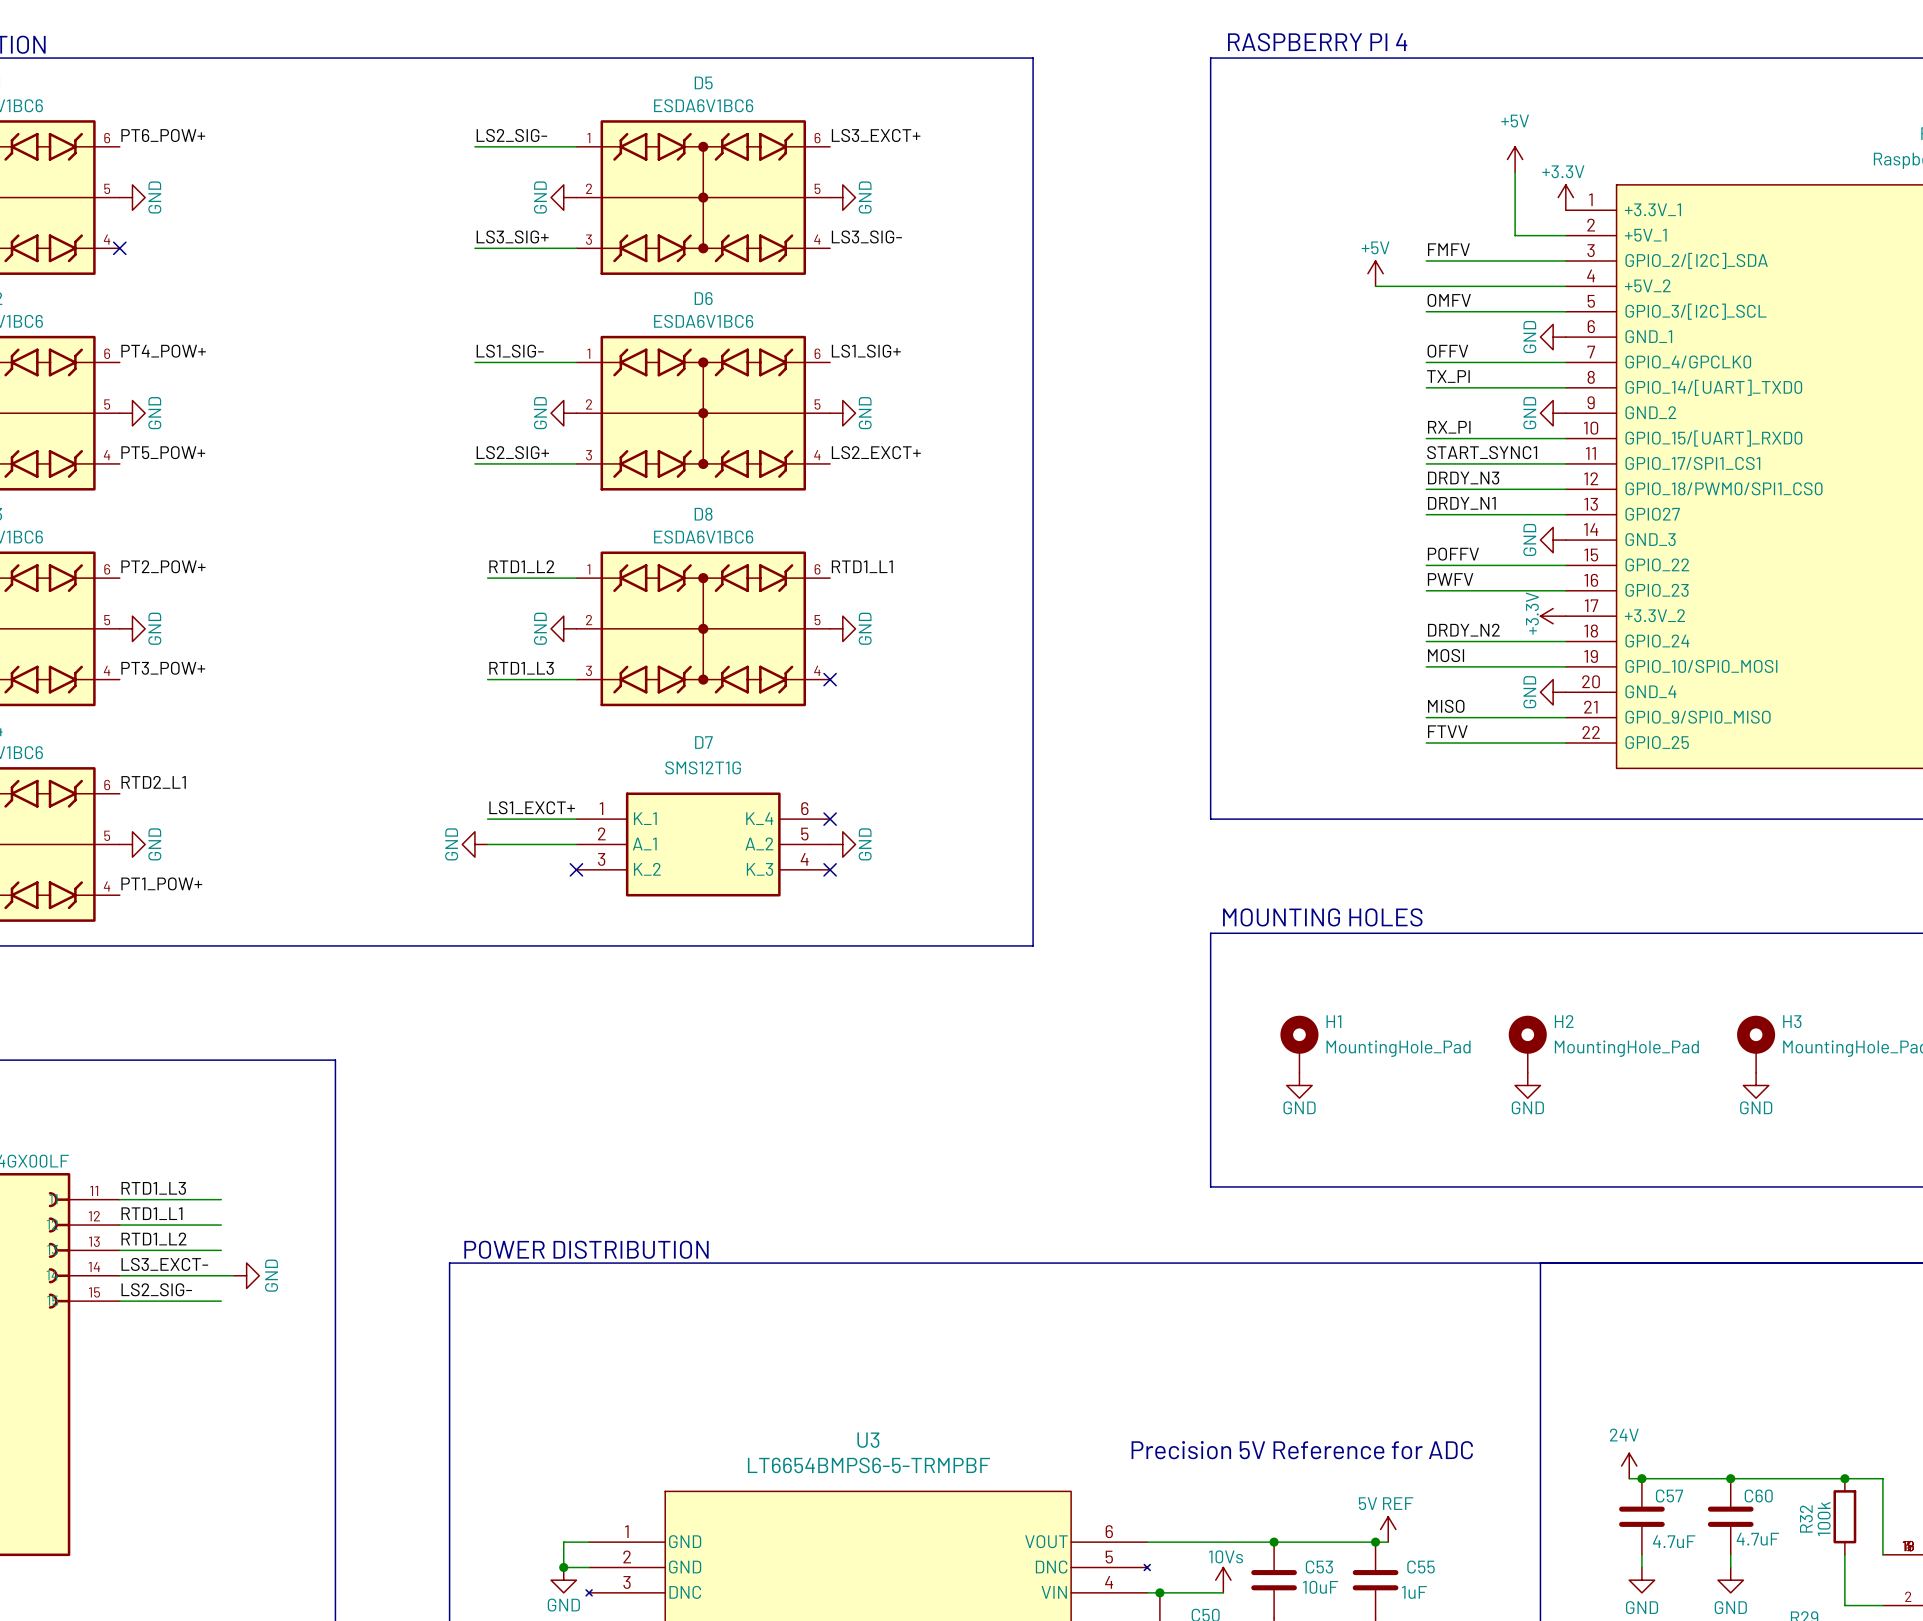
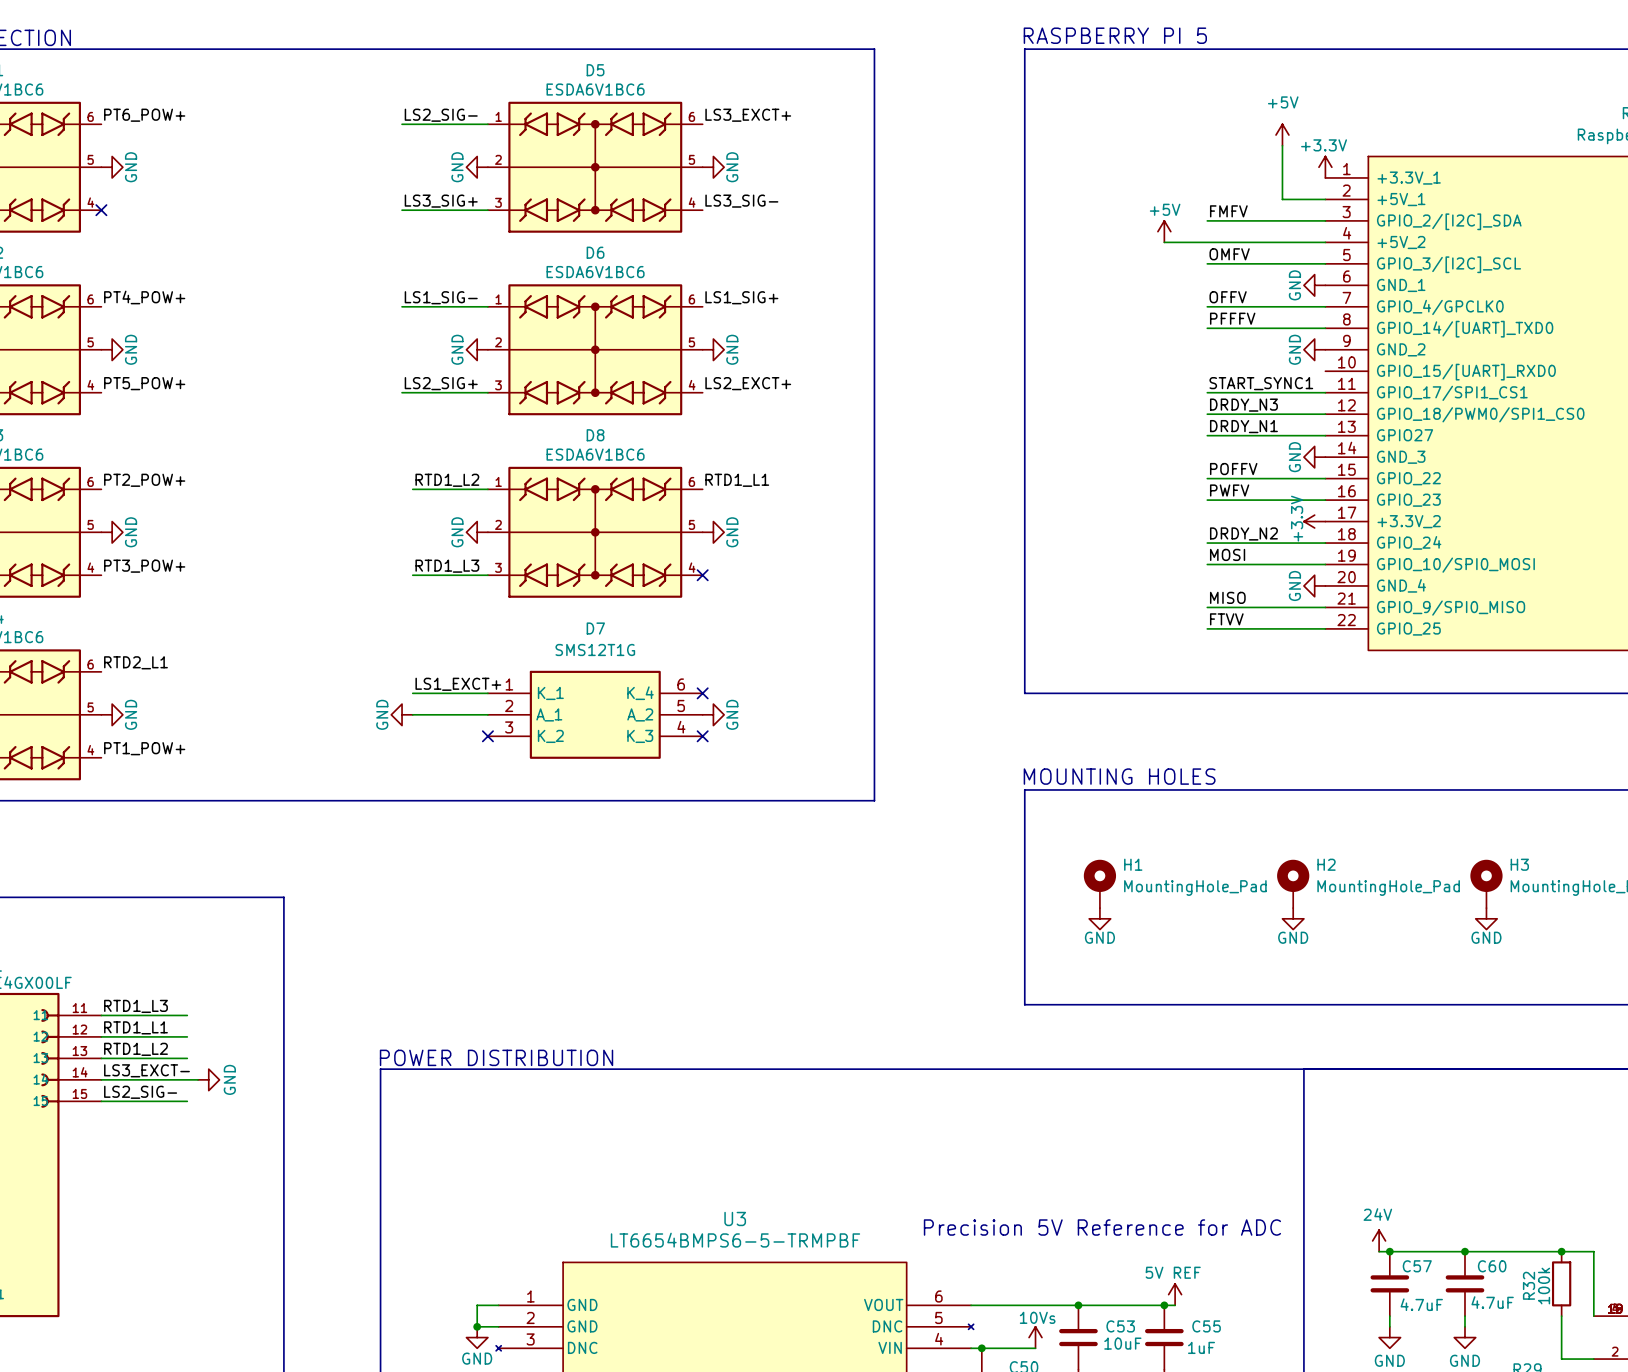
text: RASPBERRY PI 4 (1317, 42) -> RASPBERRY PI 5 (1115, 35)
label: TX_PI (1448, 376) -> PFFFV (1232, 318)
label: RX_PI (1449, 427) -> none
wire: (1426, 438) (1565, 438) -> none

